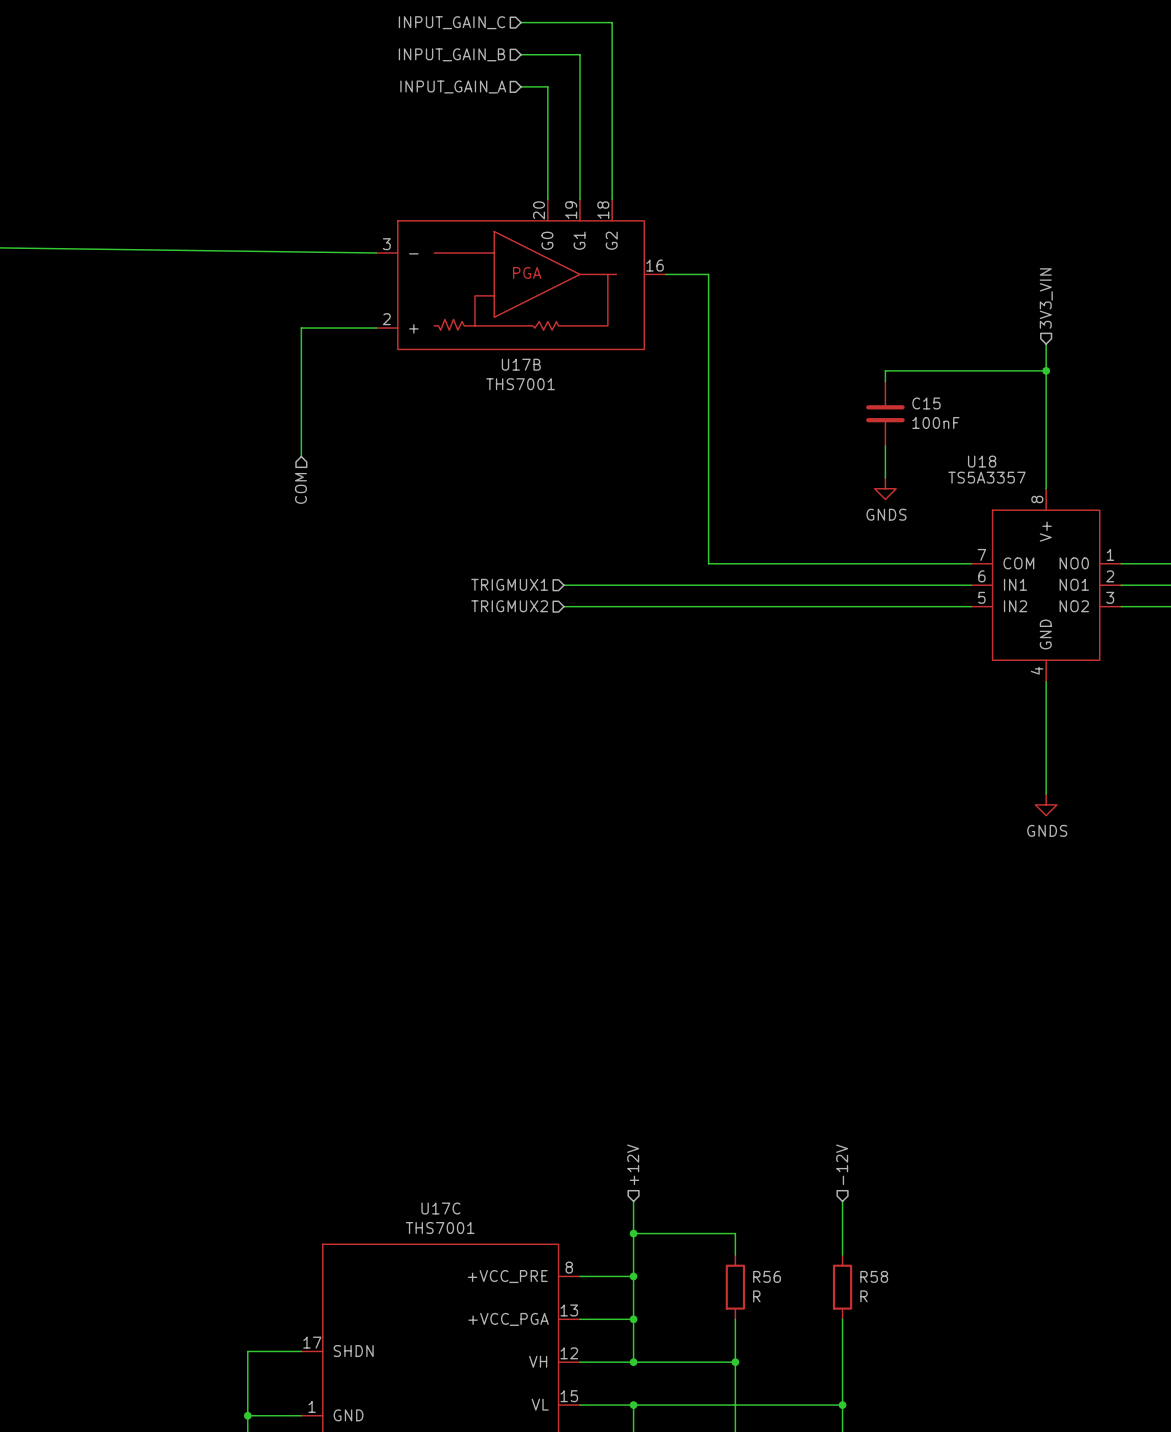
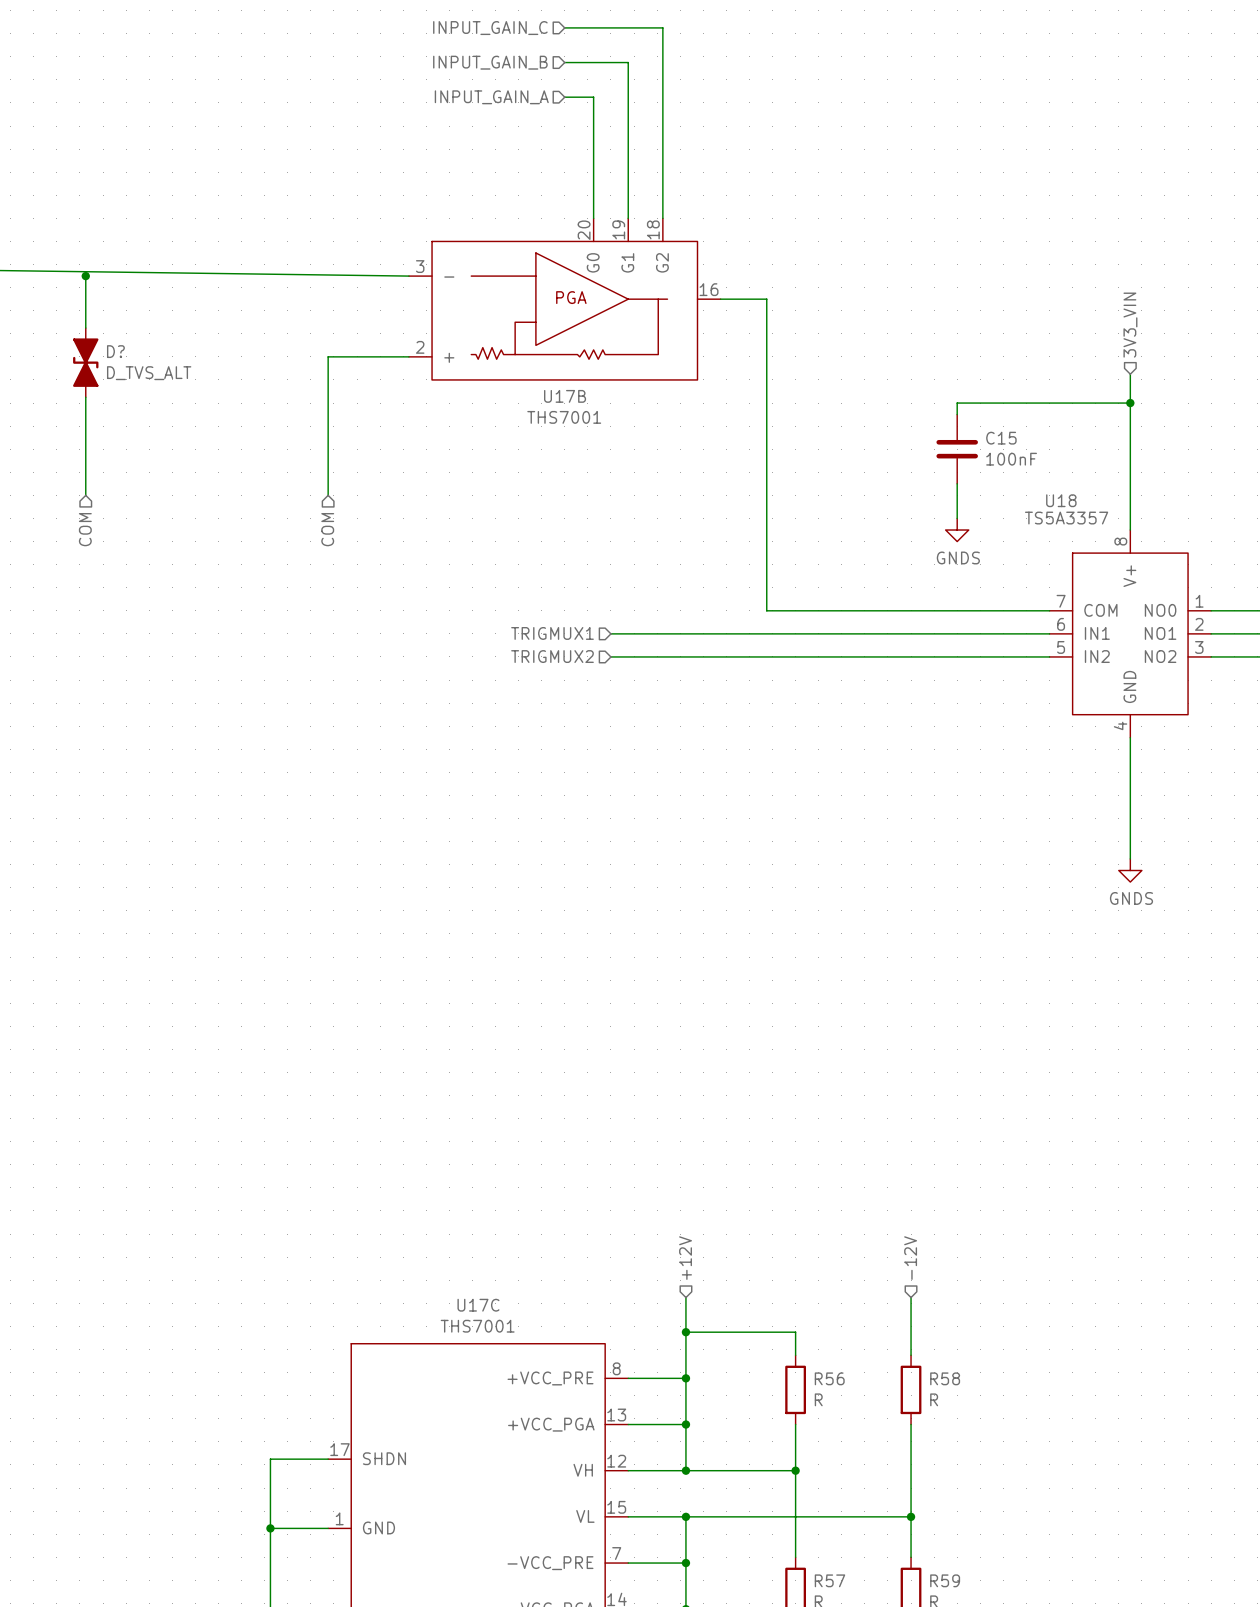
wire: none -> (85, 276) (85, 328)
junction: none -> (85, 276)
D?: none -> D_TVS_ALT (85, 362)
wire: none -> (85, 397) (85, 495)
hierarchical label: none -> COM (85, 529)

